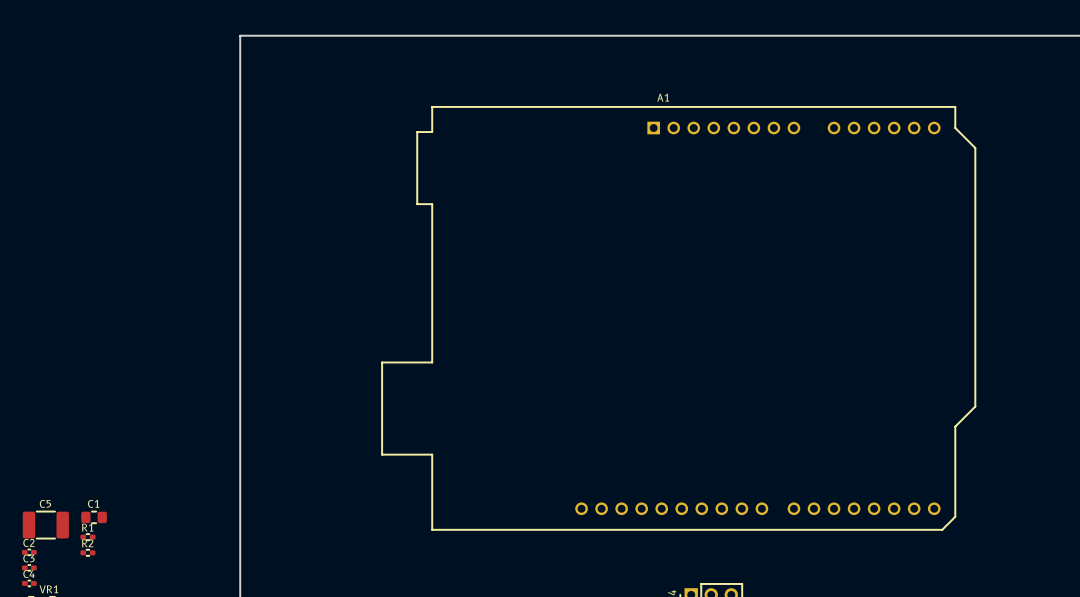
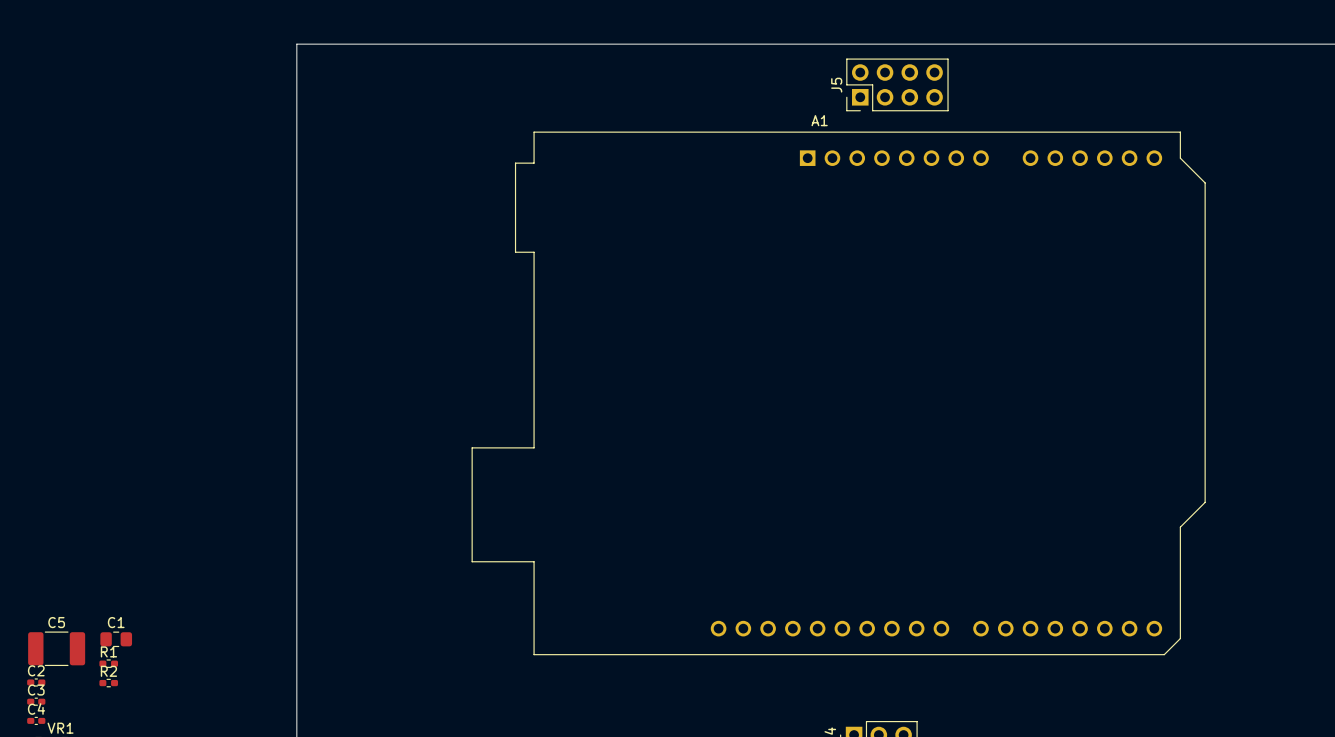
J5: none -> (897, 84)

